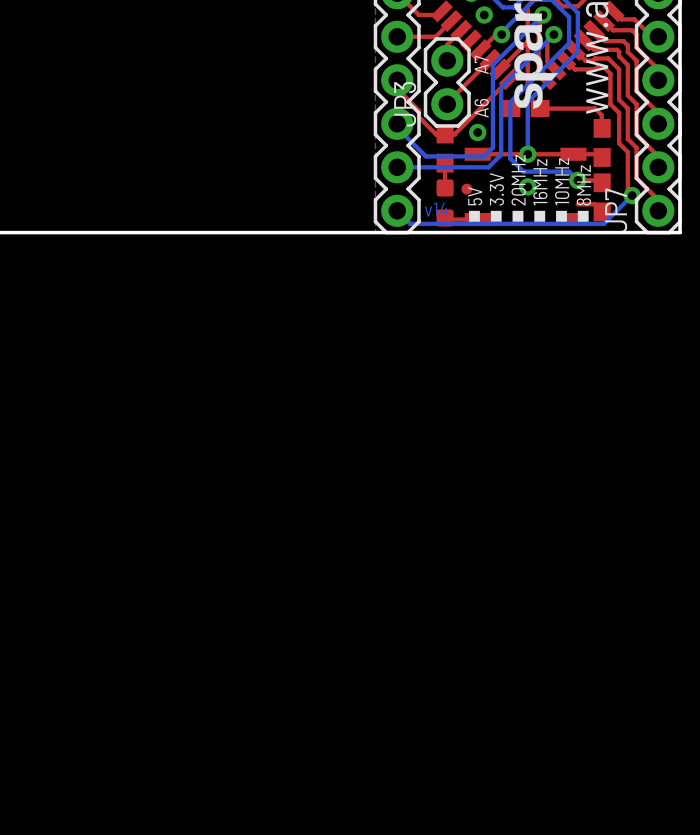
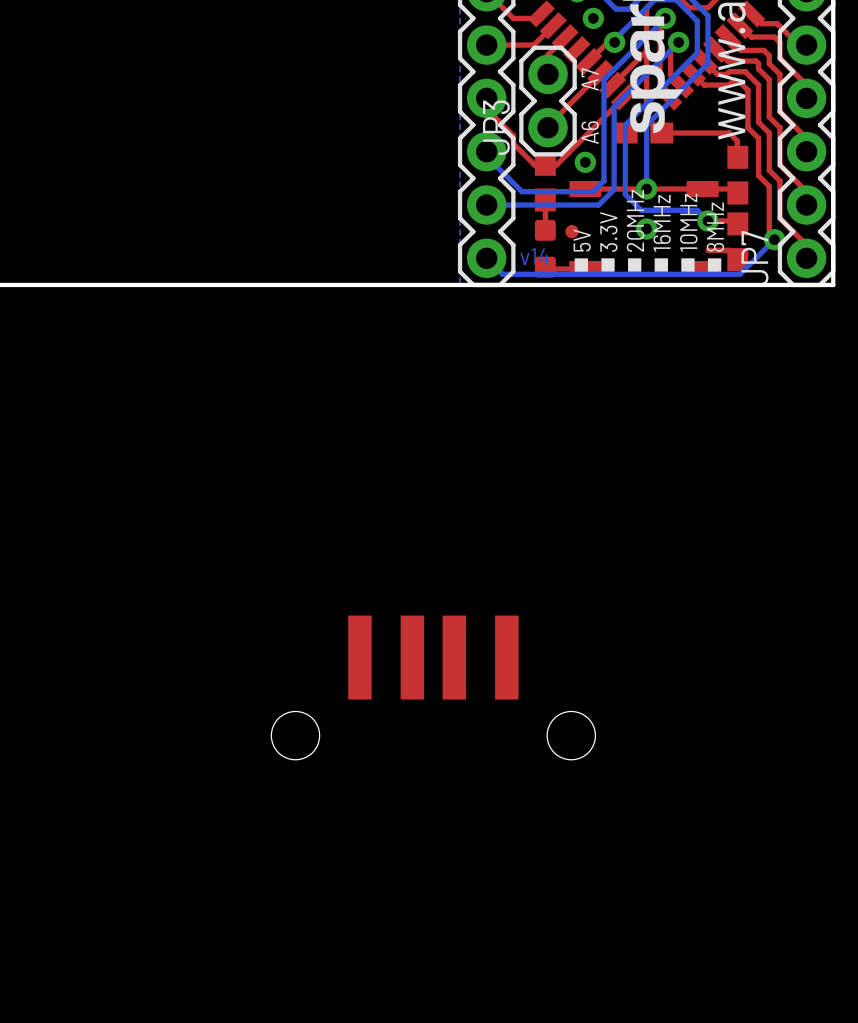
part: none -> (433, 687)

